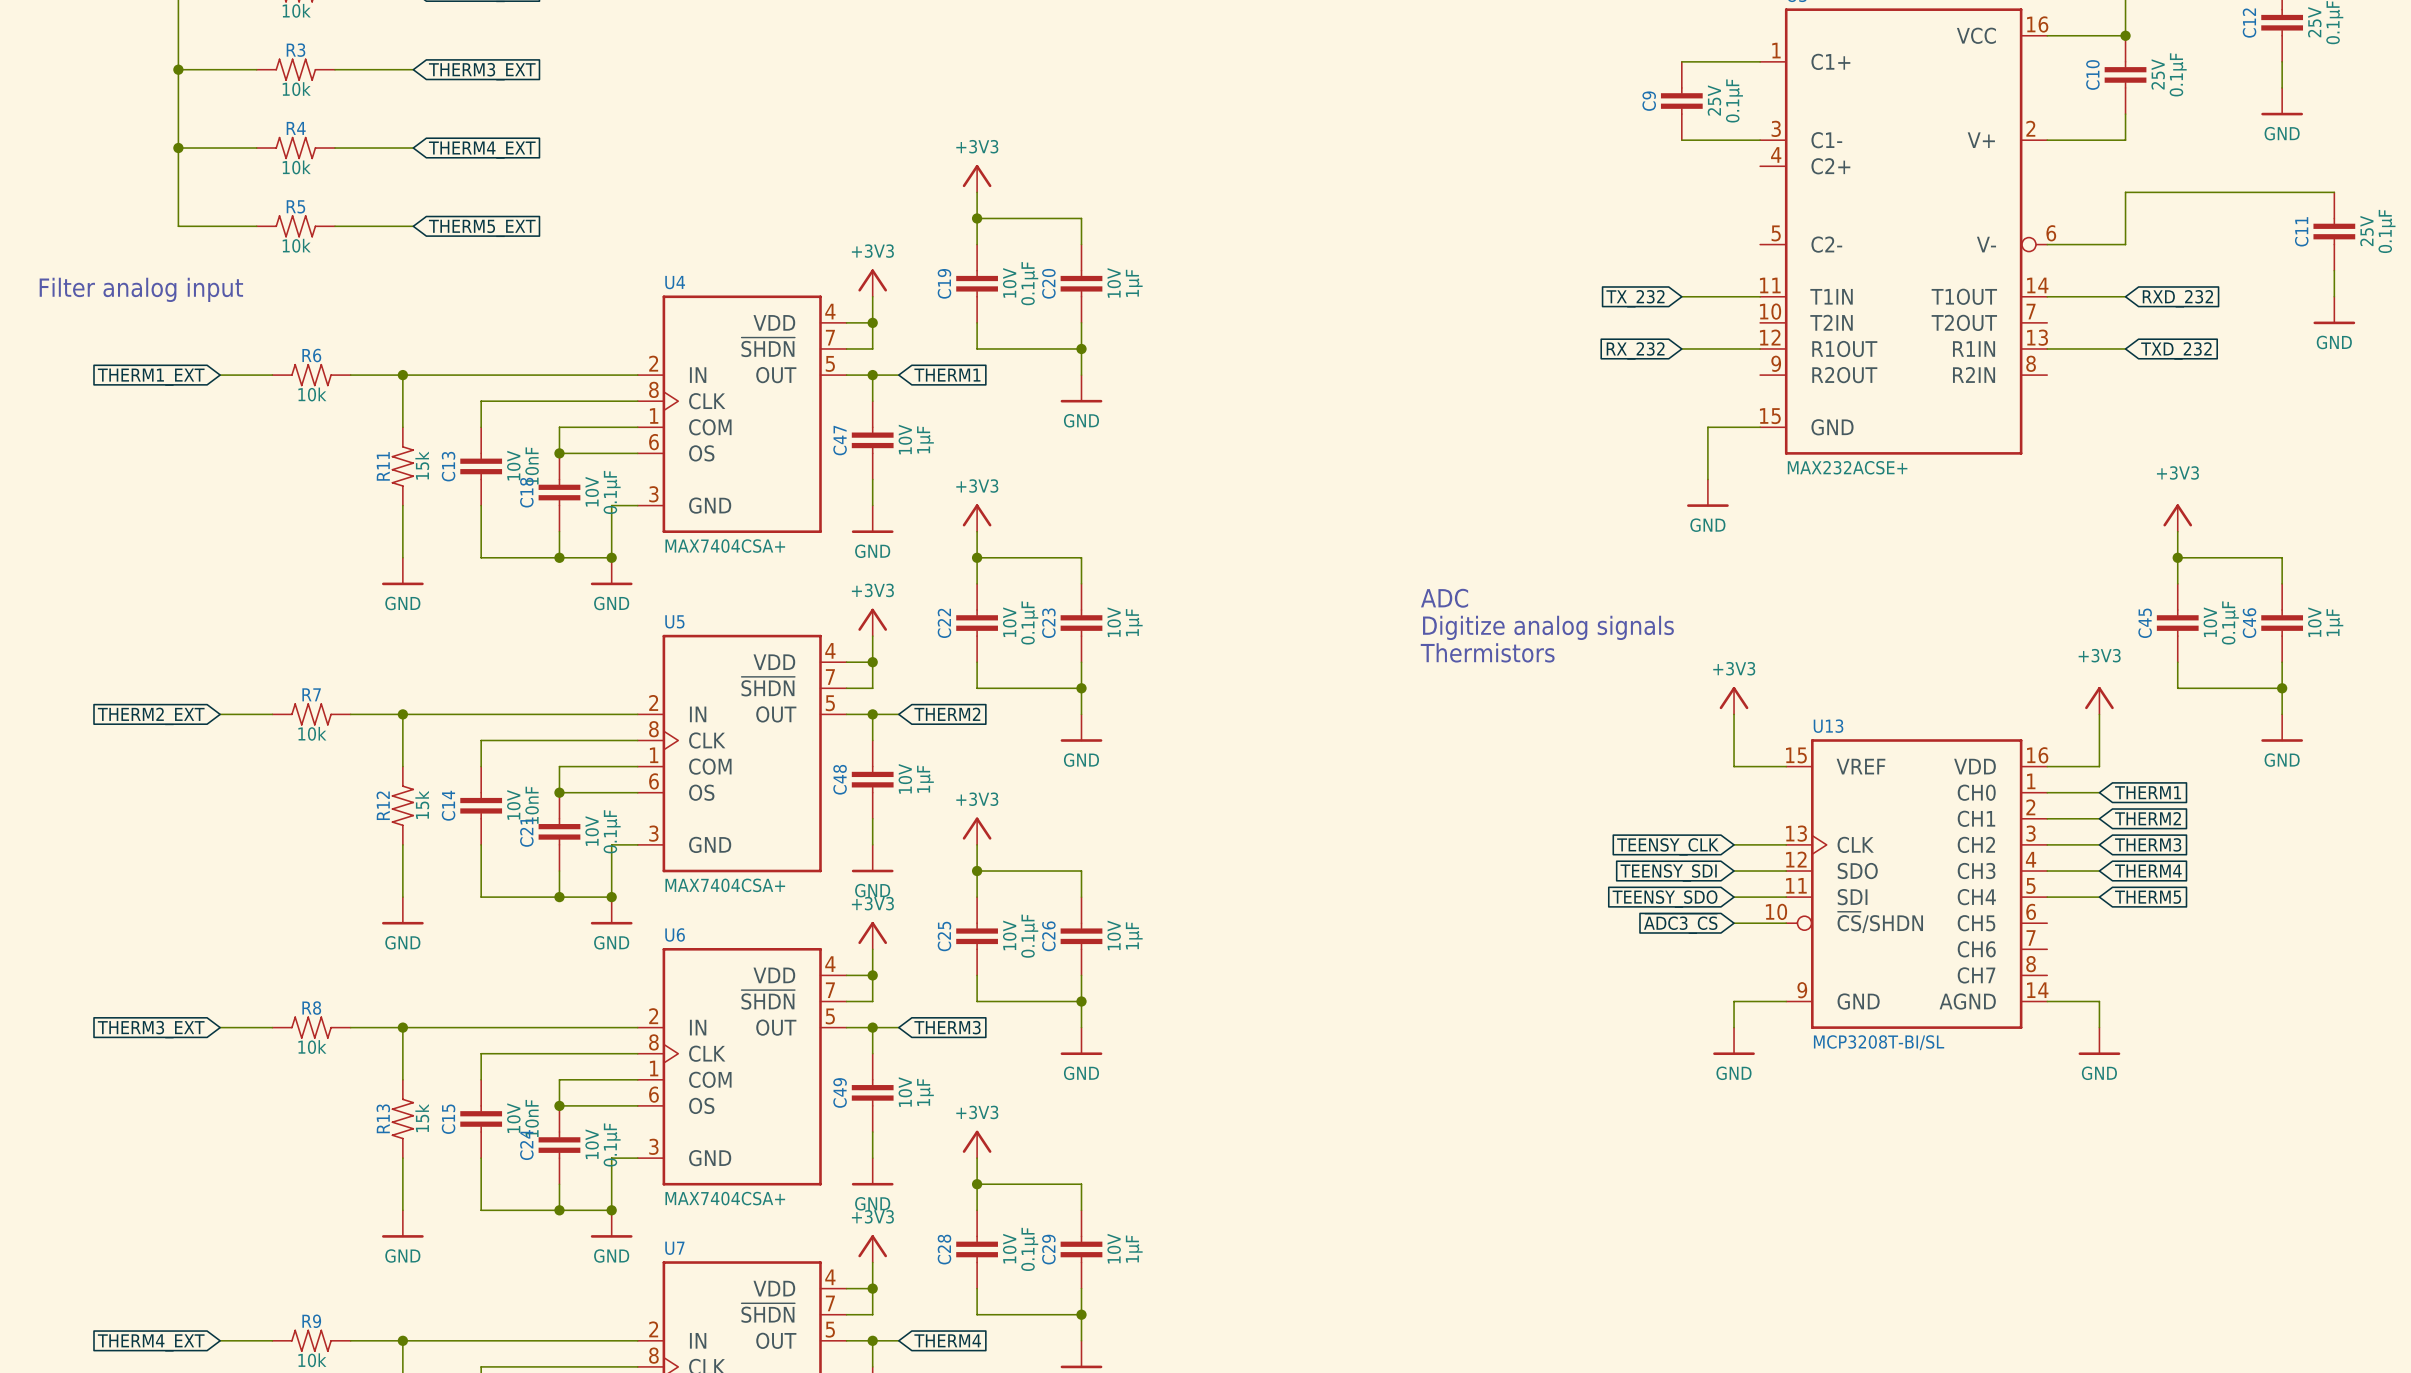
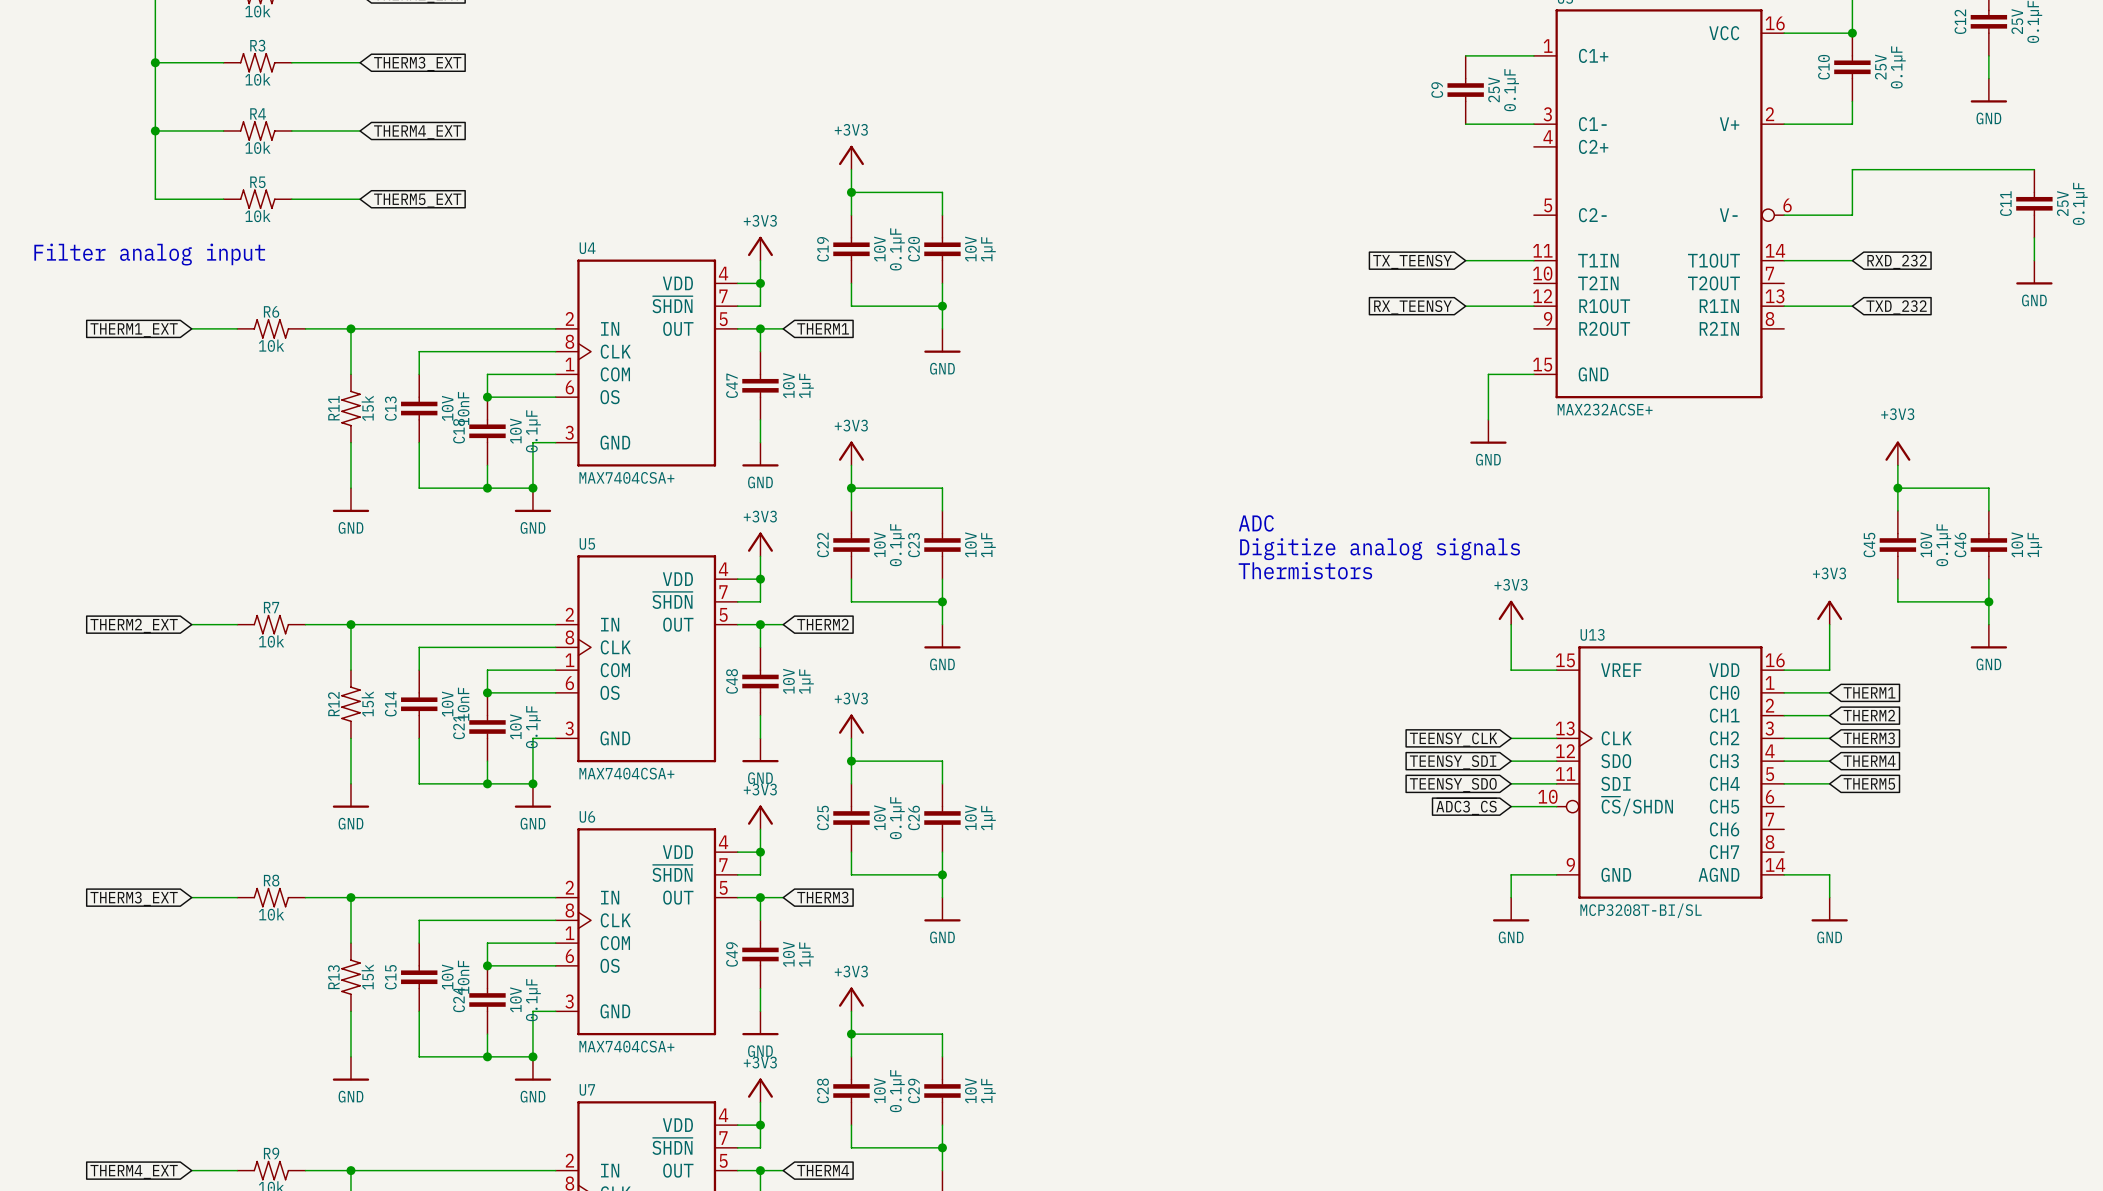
global label: TX_232 (1635, 298) -> TX_TEENSY (1412, 261)
global label: RX_232 (1635, 350) -> RX_TEENSY (1412, 307)

